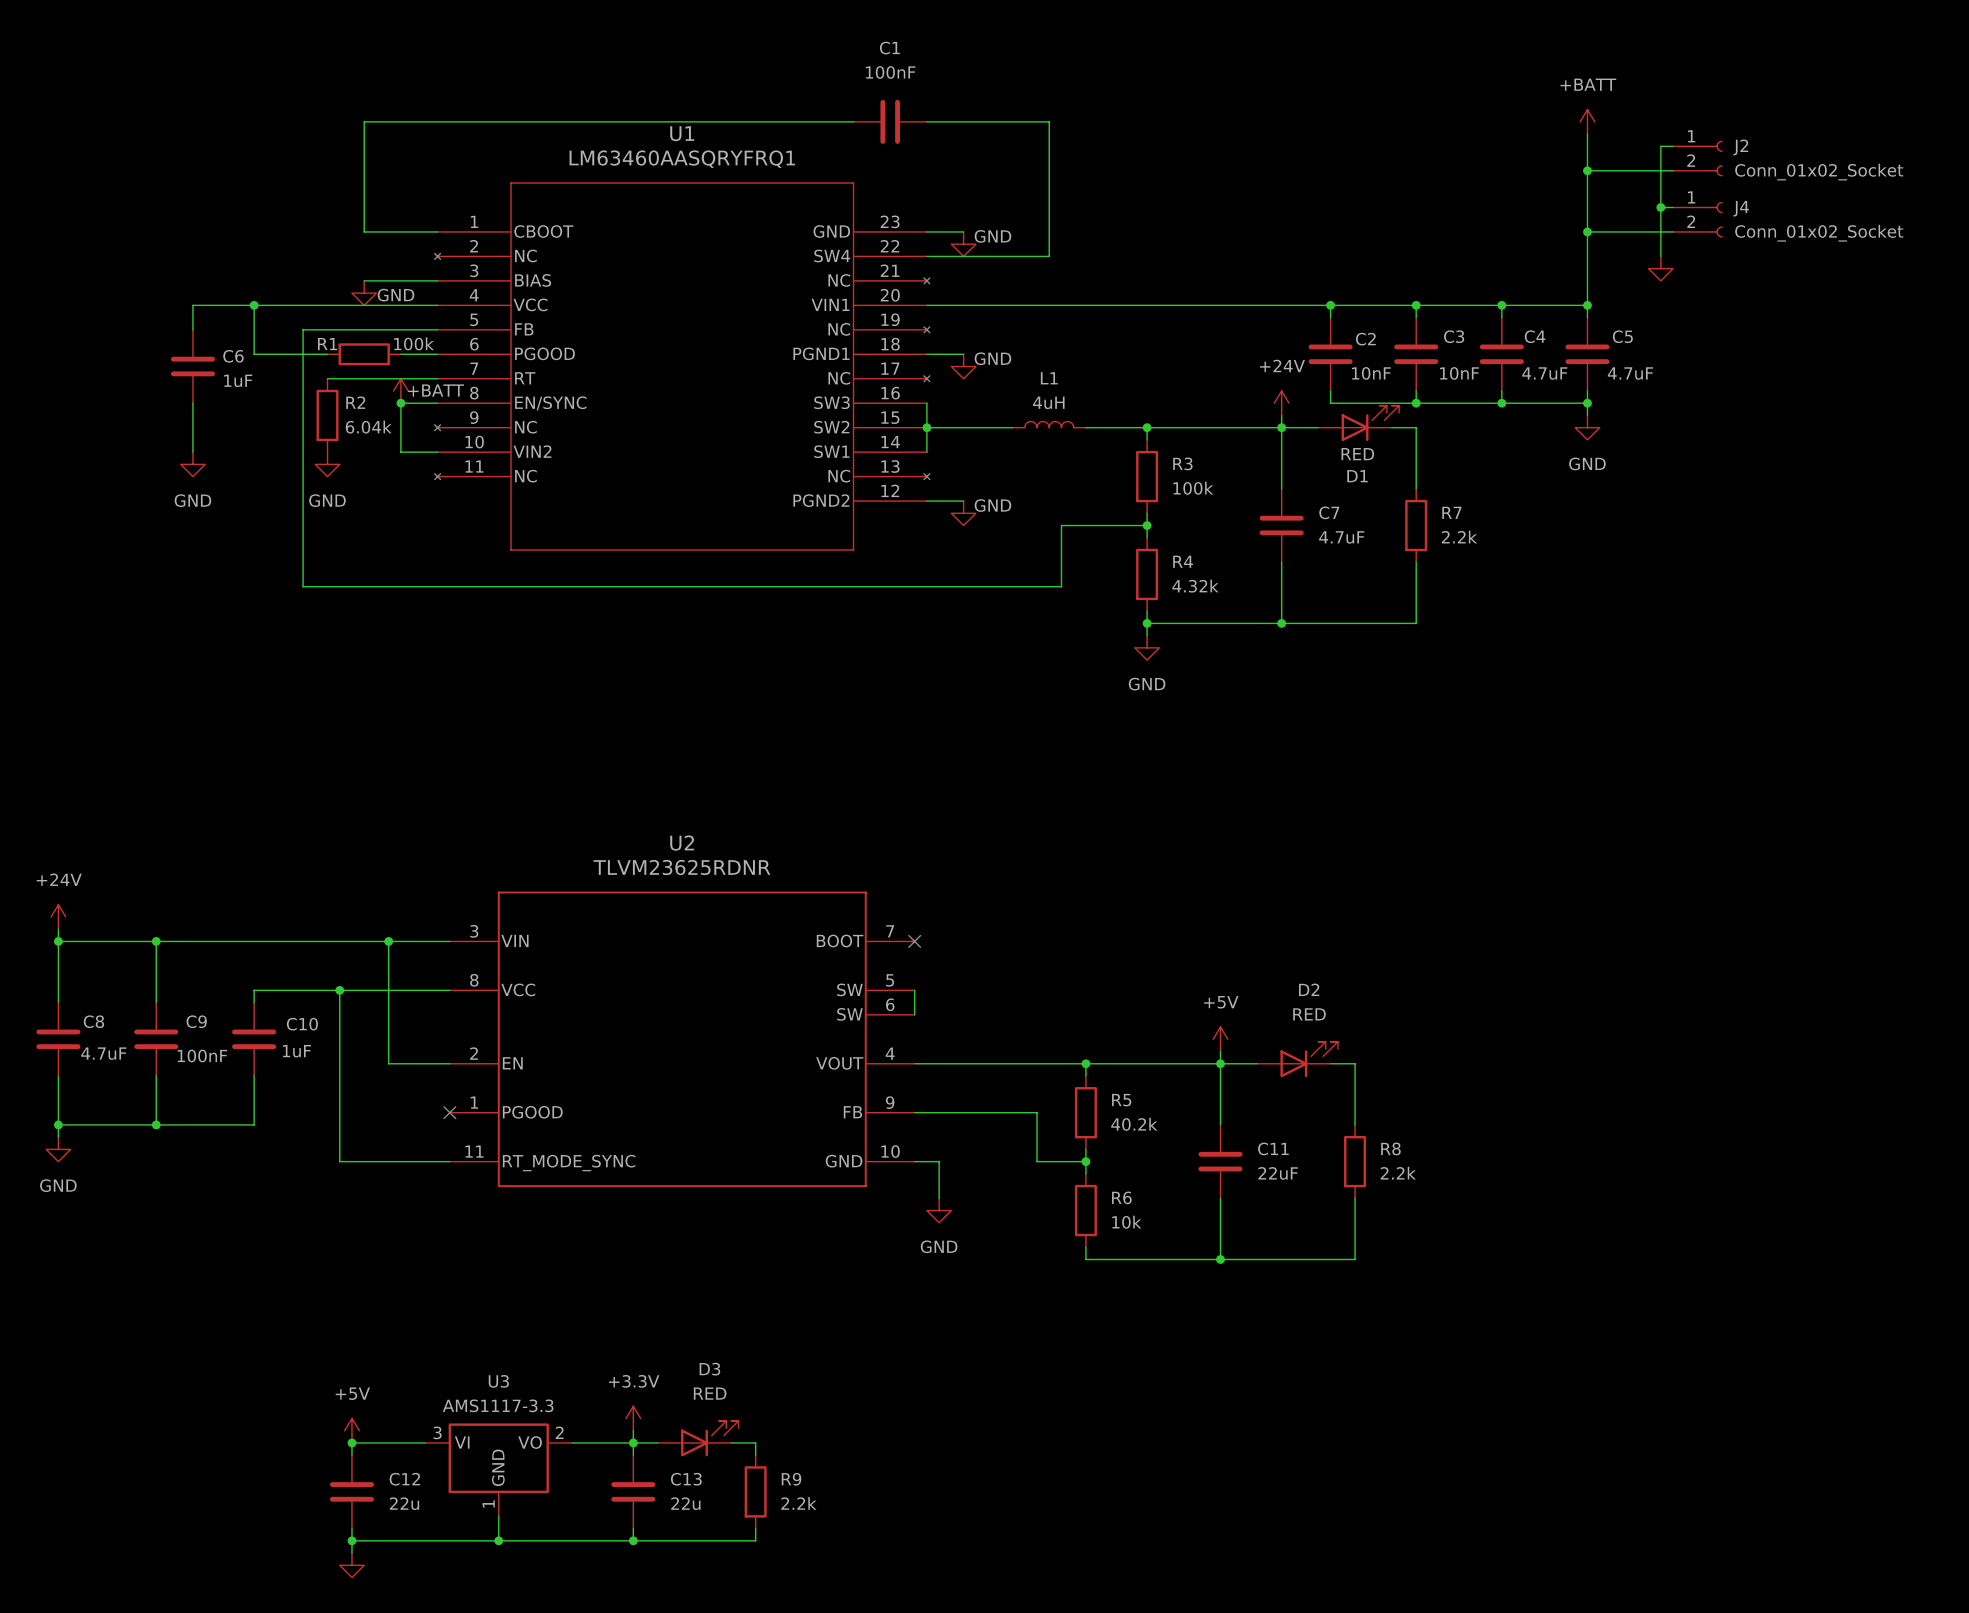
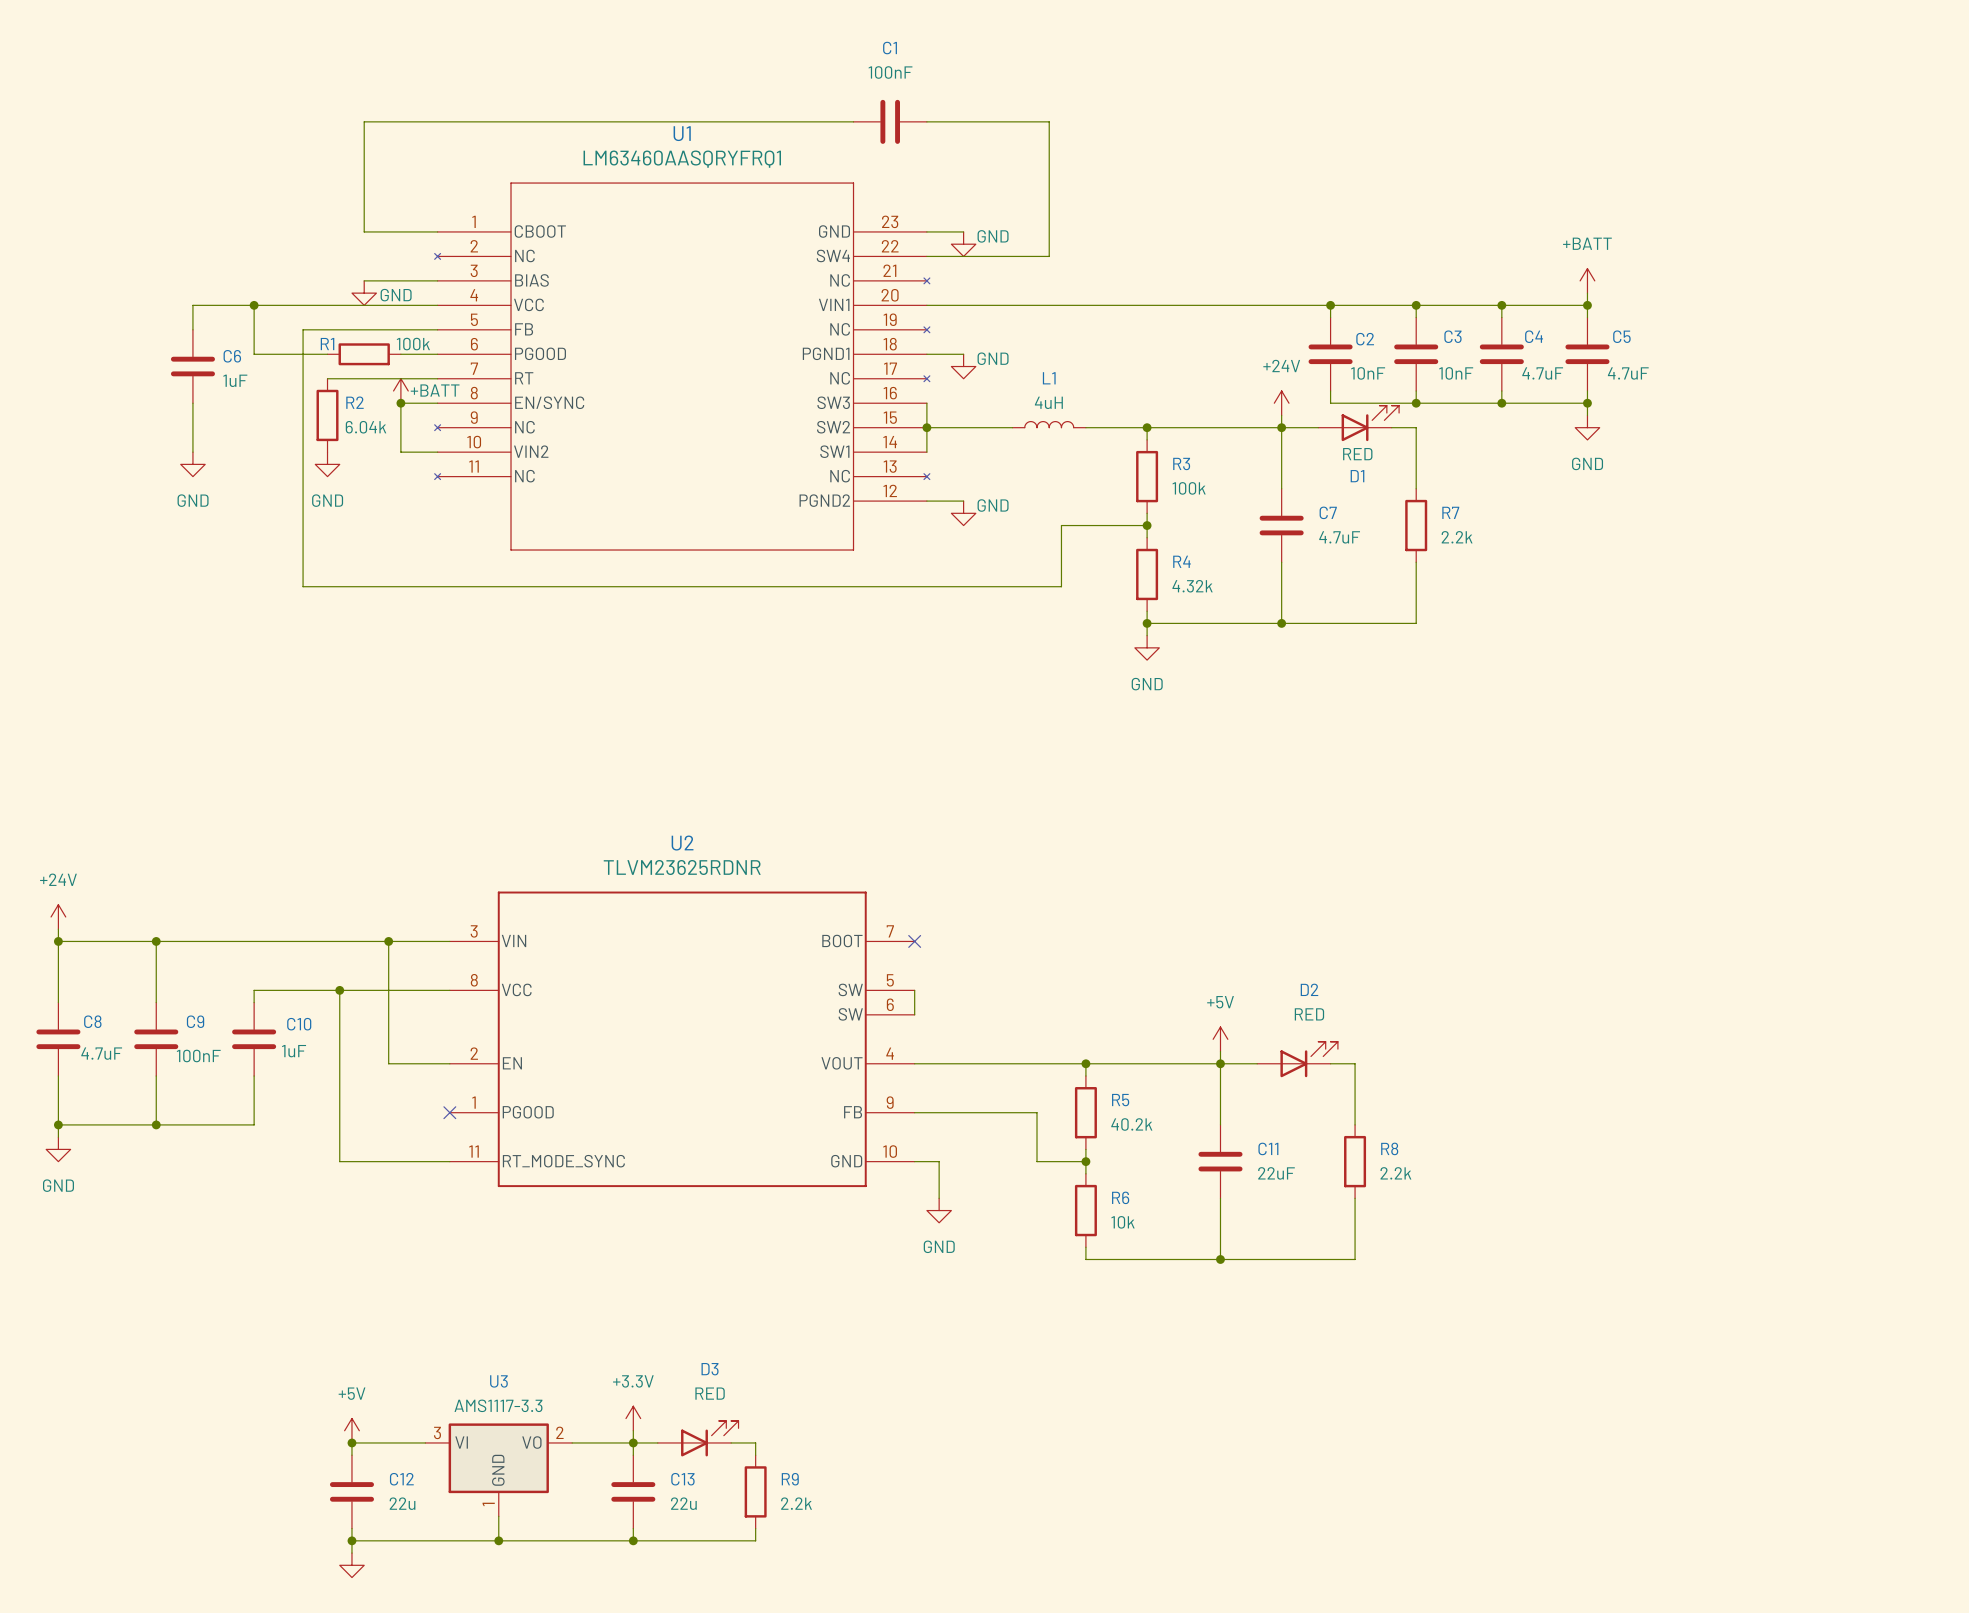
power symbol position: +BATT (1587, 121) -> +BATT (1587, 280)
wire: (1587, 134) (1587, 293) -> none
wire: (1673, 146) (1660, 146) (1660, 256) -> none
J2: Conn_01x02_Socket (1697, 158) -> none
wire: (1587, 170) (1673, 170) -> none
junction: (1587, 170) -> none
wire: (1660, 207) (1673, 207) -> none
junction: (1660, 207) -> none
J4: Conn_01x02_Socket (1697, 219) -> none
wire: (1587, 231) (1673, 231) -> none
junction: (1587, 231) -> none
power symbol: (1660, 268) -> none

